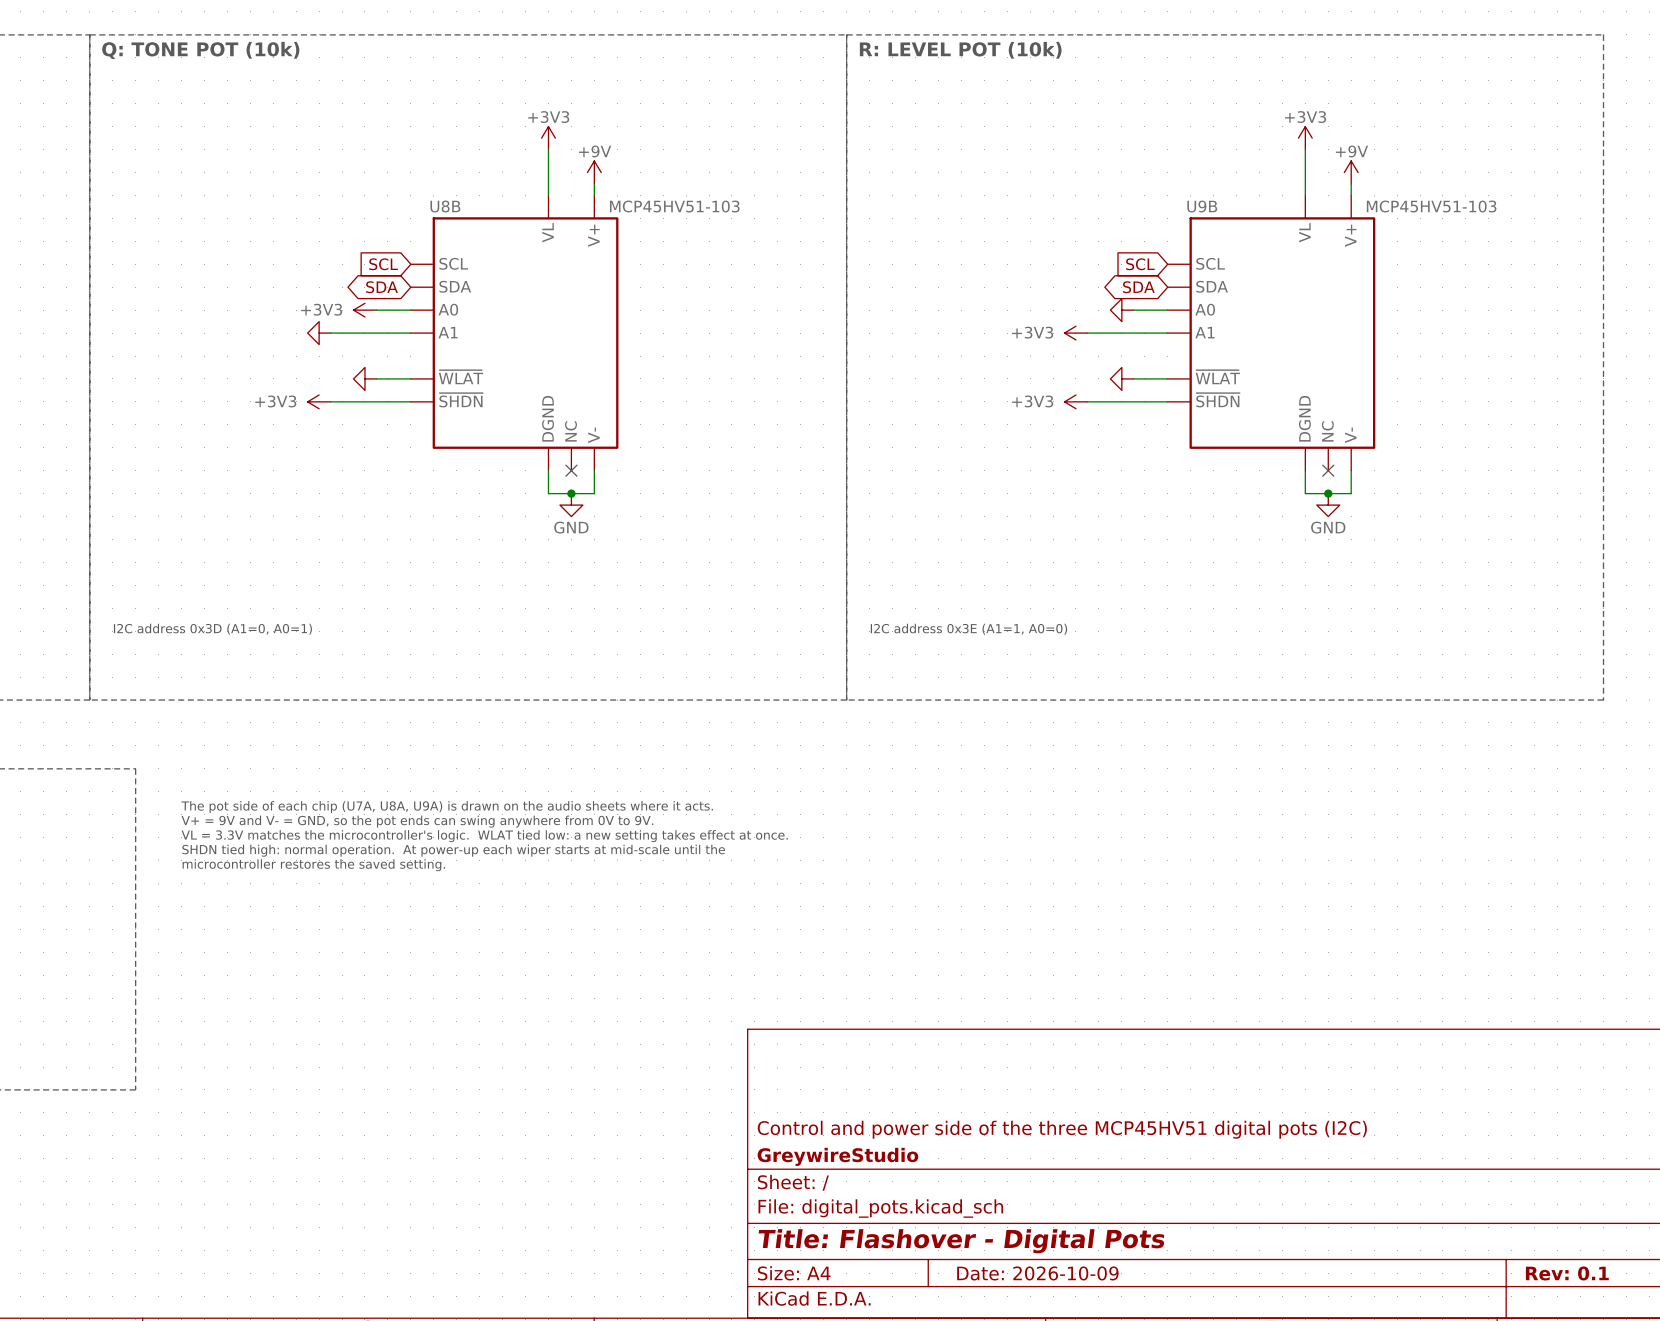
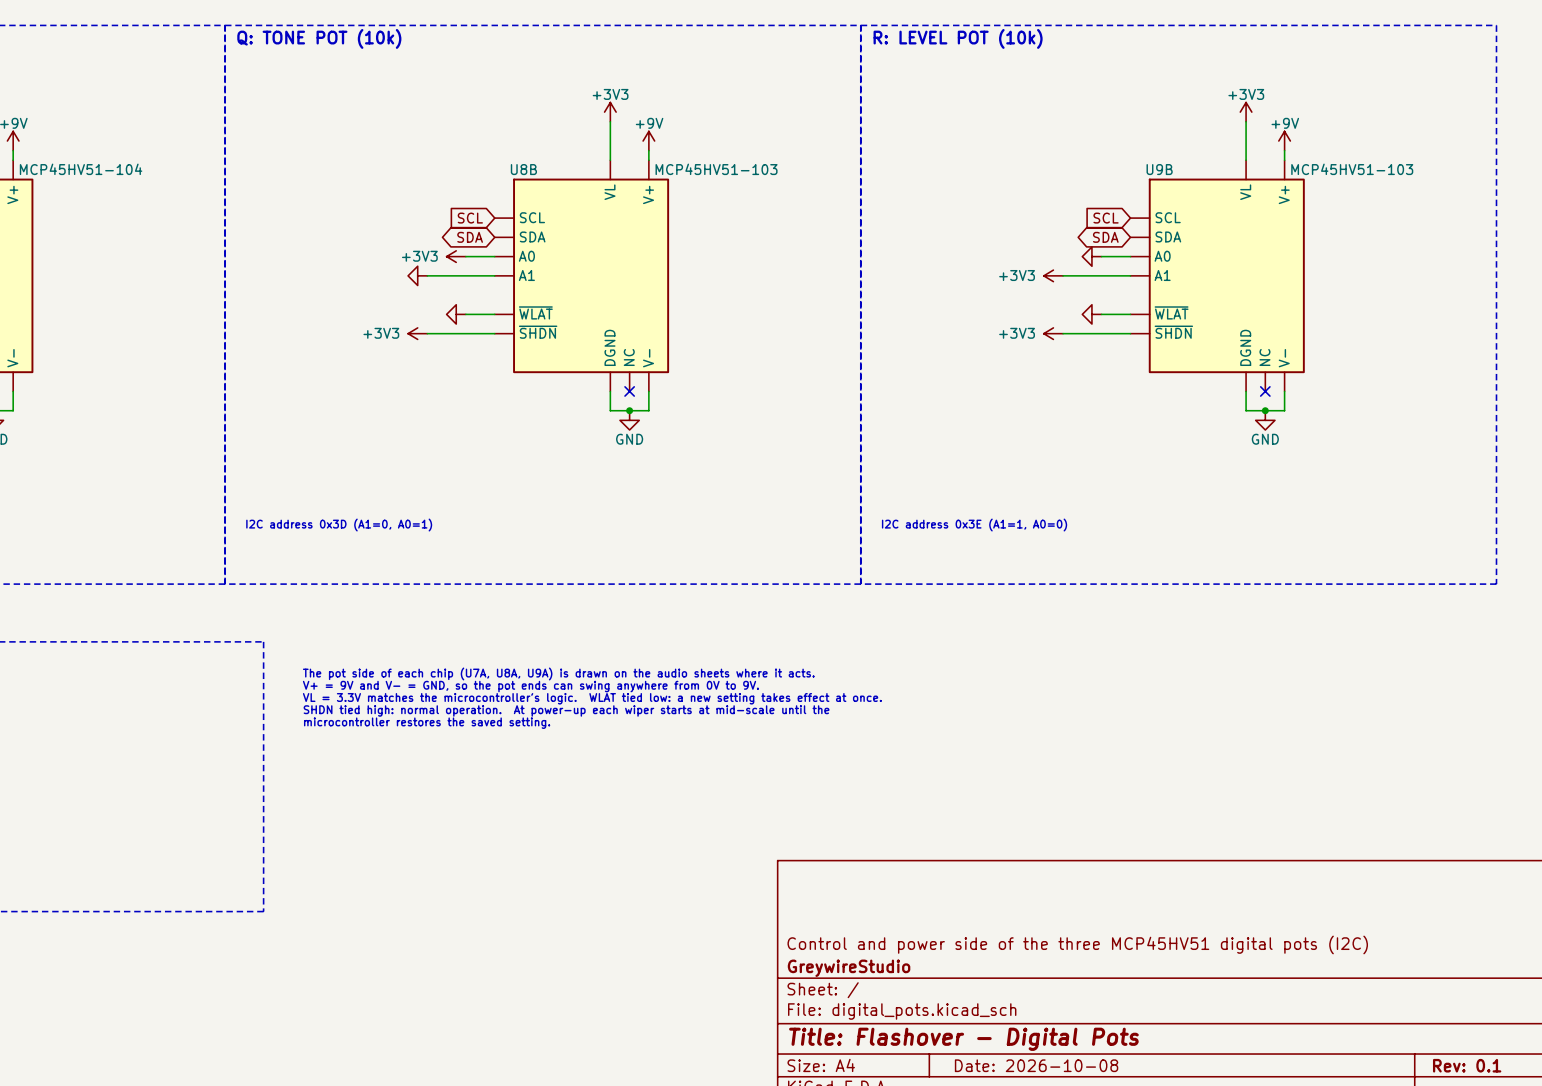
title block: Date: 2026-10-09 (1037, 1273) -> Date: 2026-10-08 (1036, 1065)

